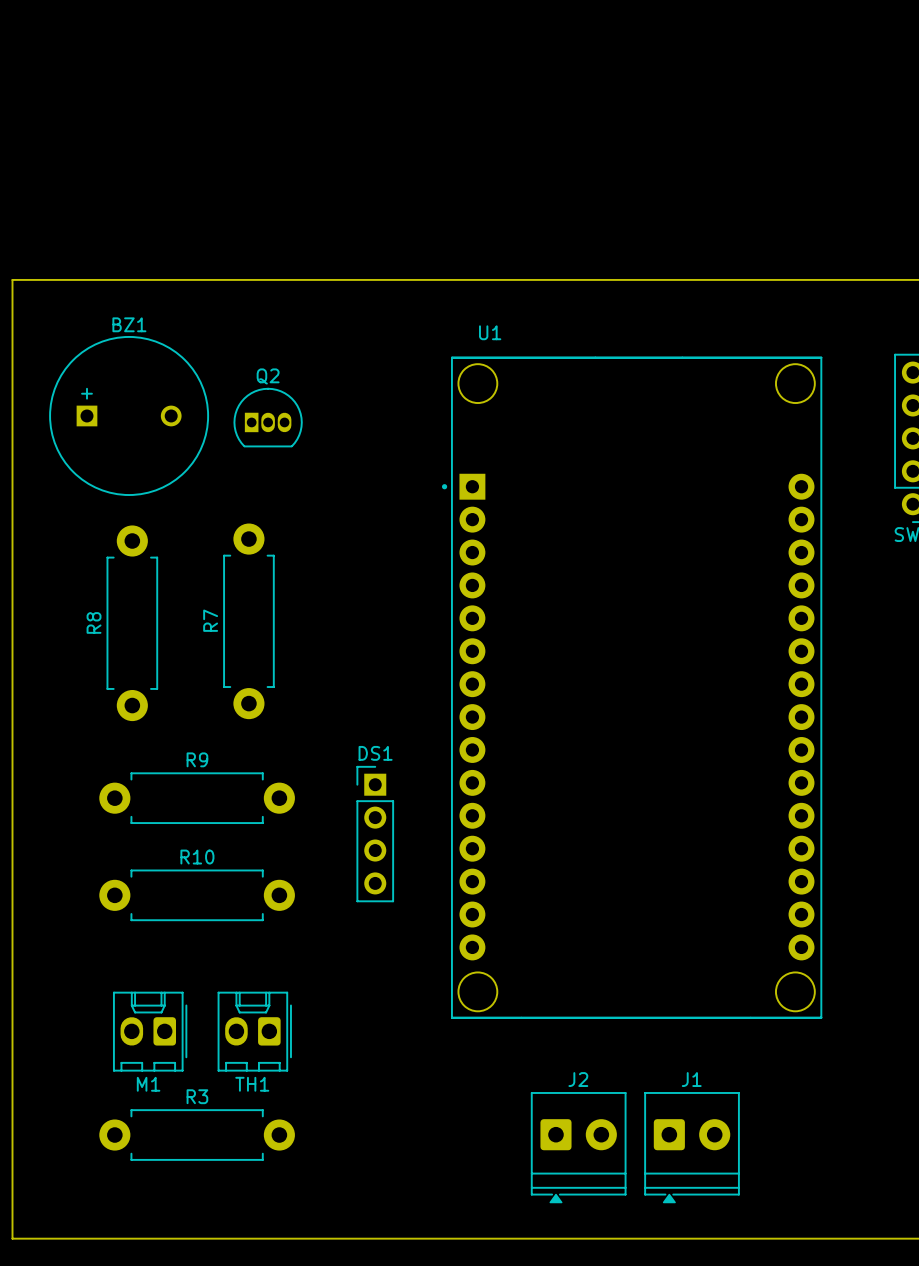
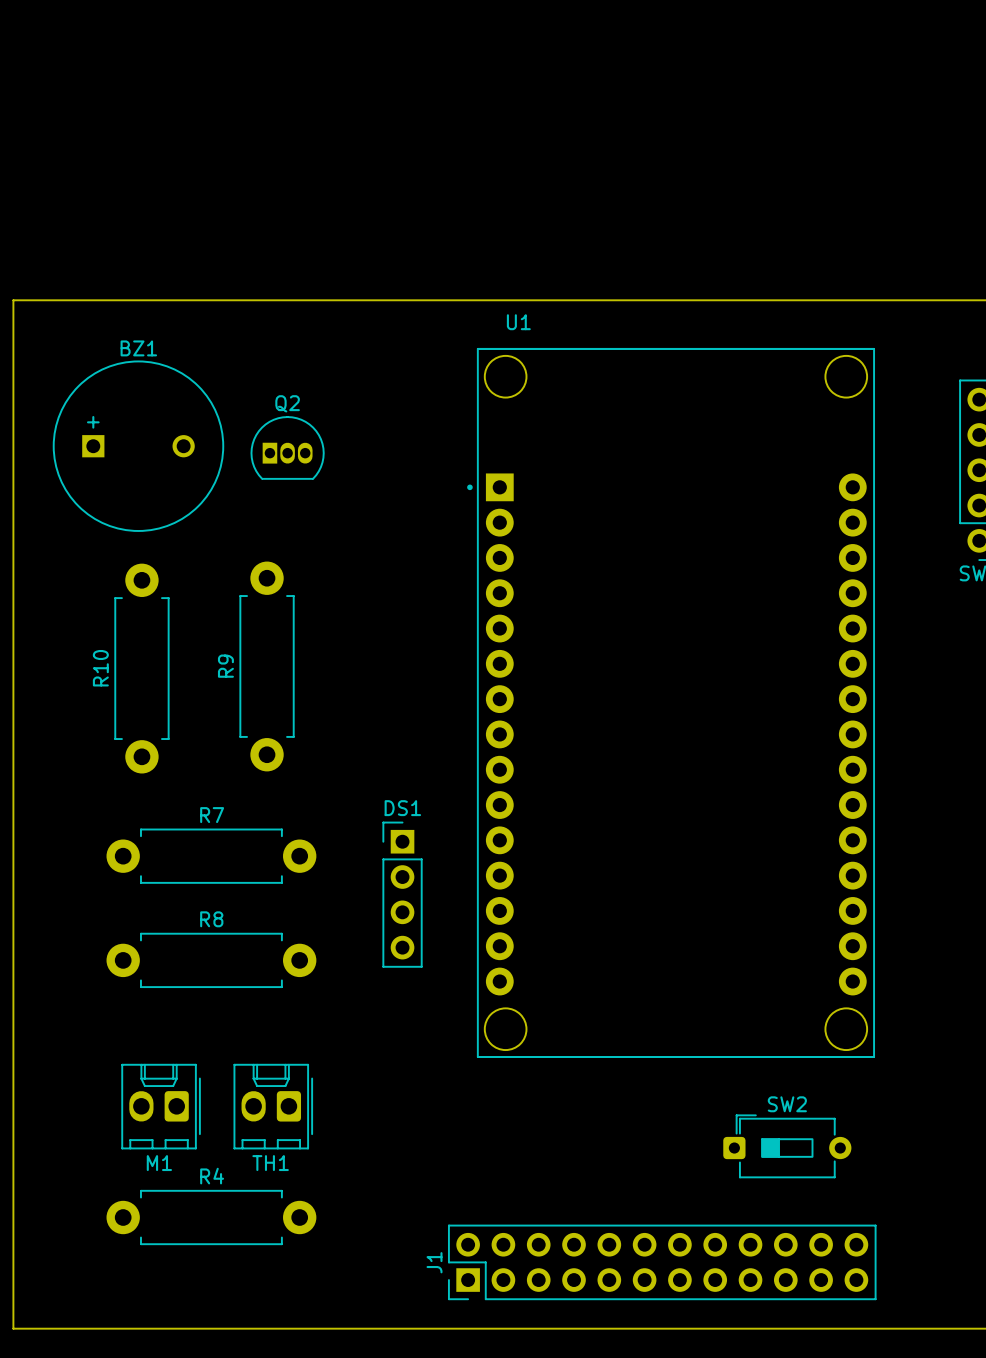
R7 name: R7 (210, 620) -> R9 (225, 666)
R8 name: R8 (94, 622) -> R10 (100, 668)
U1 position: (632, 687) -> (671, 702)
R9 name: R9 (197, 759) -> R7 (212, 815)
R10 name: R10 (197, 857) -> R8 (211, 919)
SW2: none -> (787, 1146)
J1 name position: J1 (691, 1079) -> J1 (434, 1262)
J1 footprint: [644, 1092, 740, 1204] -> [448, 1224, 877, 1301]
R3 name: R3 (197, 1096) -> R4 (212, 1176)
J2: (578, 1147) -> none

